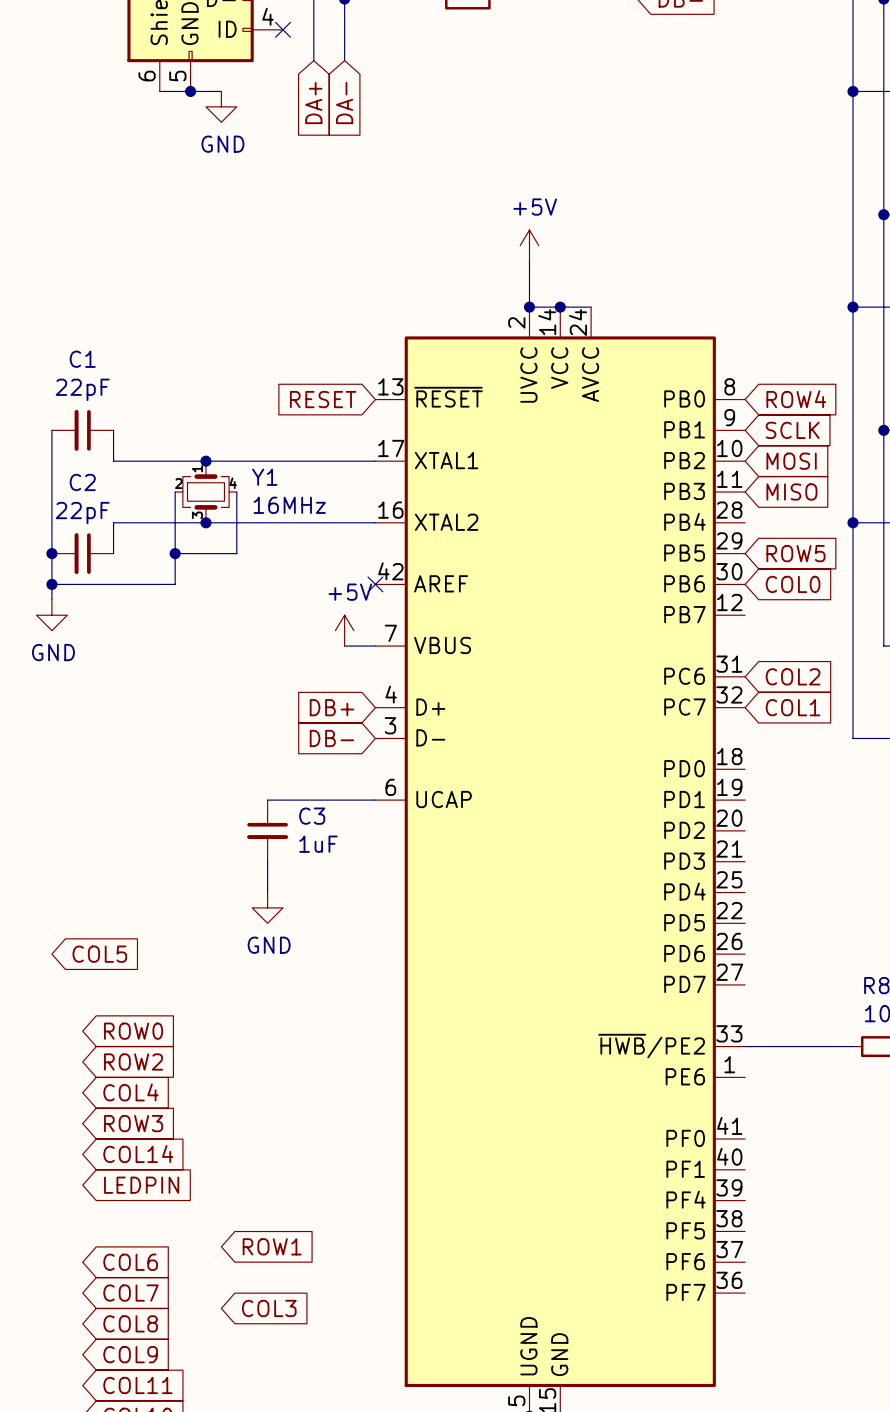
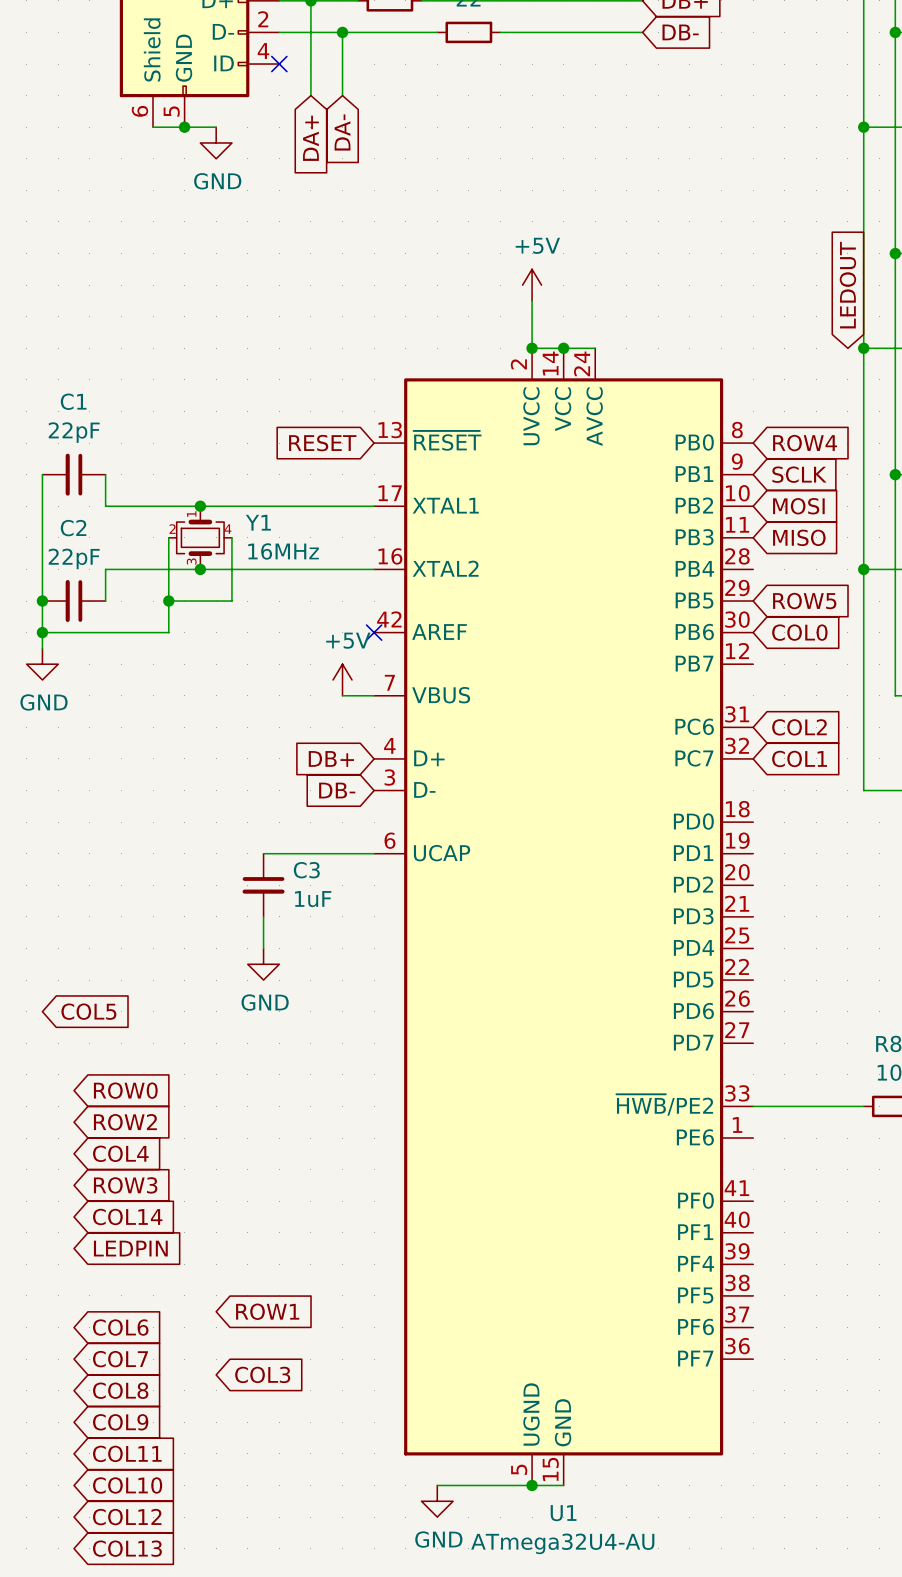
global label: none -> LEDOUT (847, 285)

